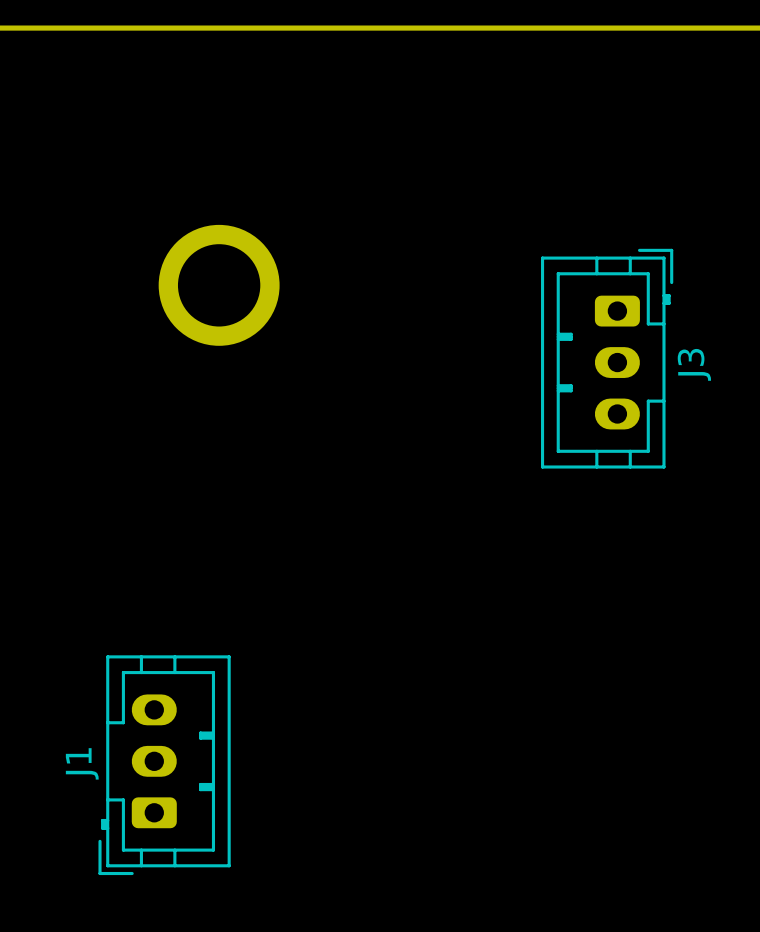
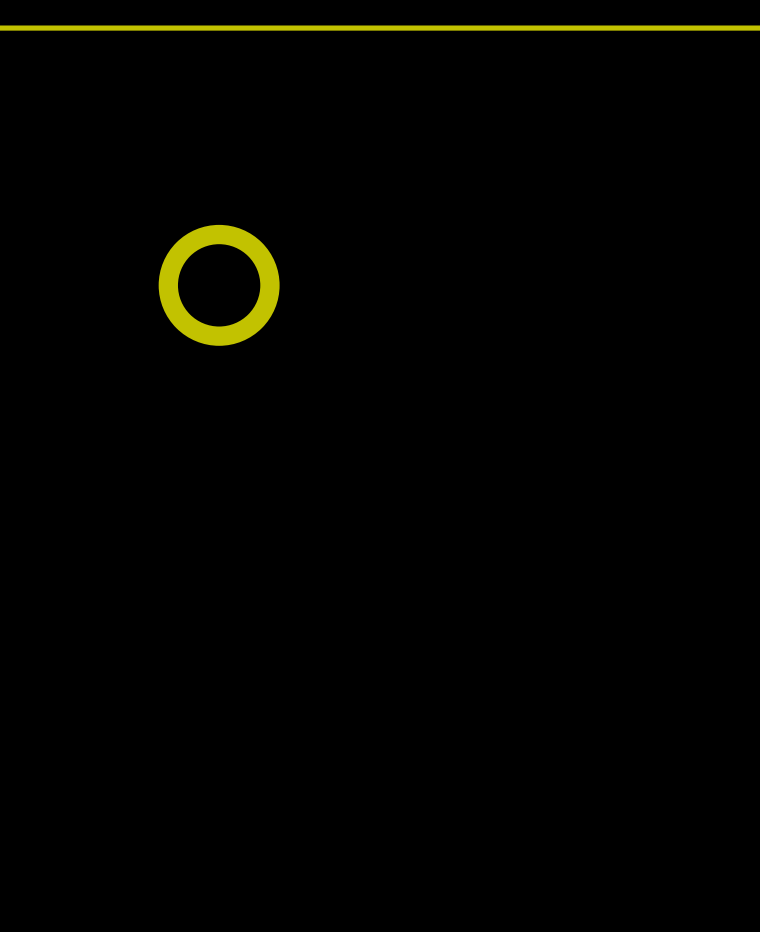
J3: (607, 358) -> none
J1: (164, 765) -> none

